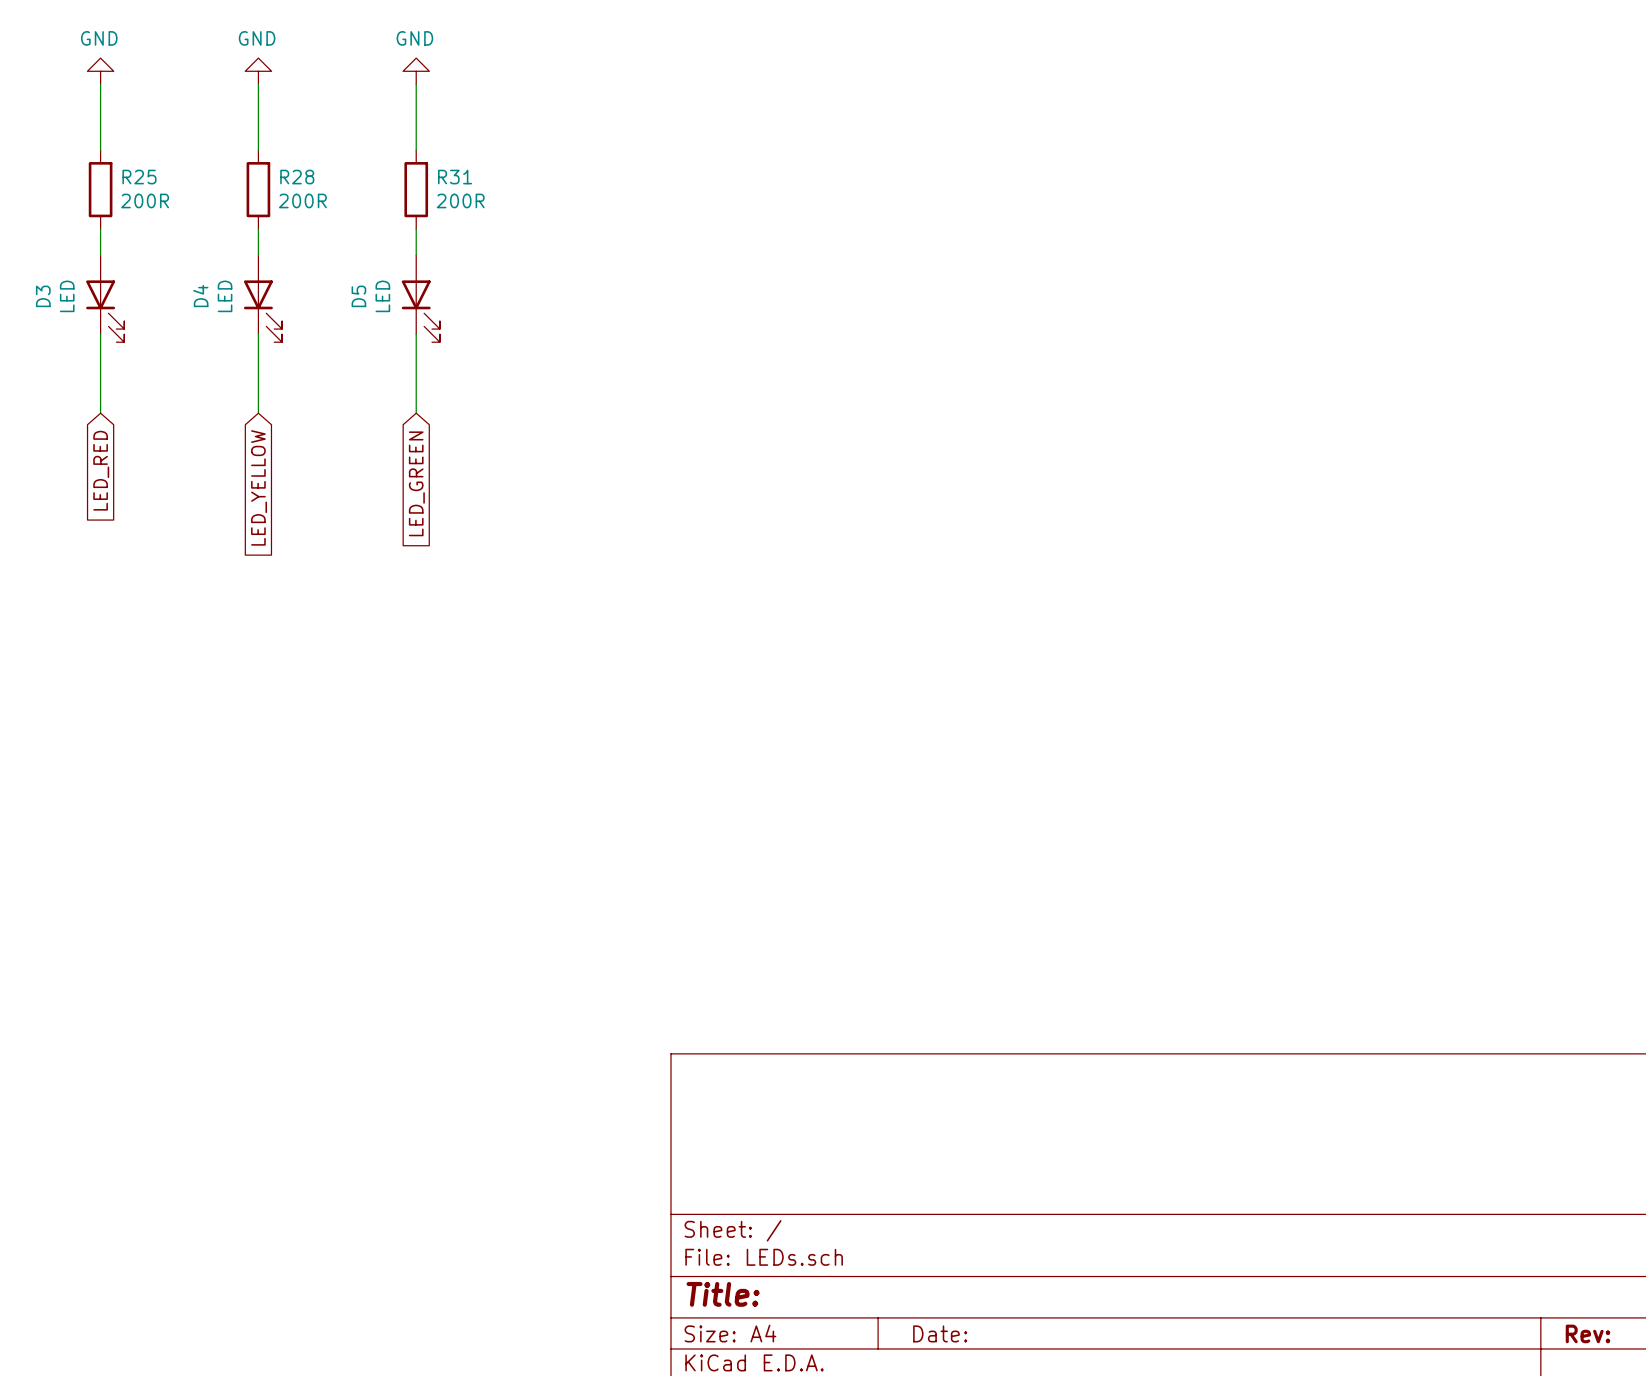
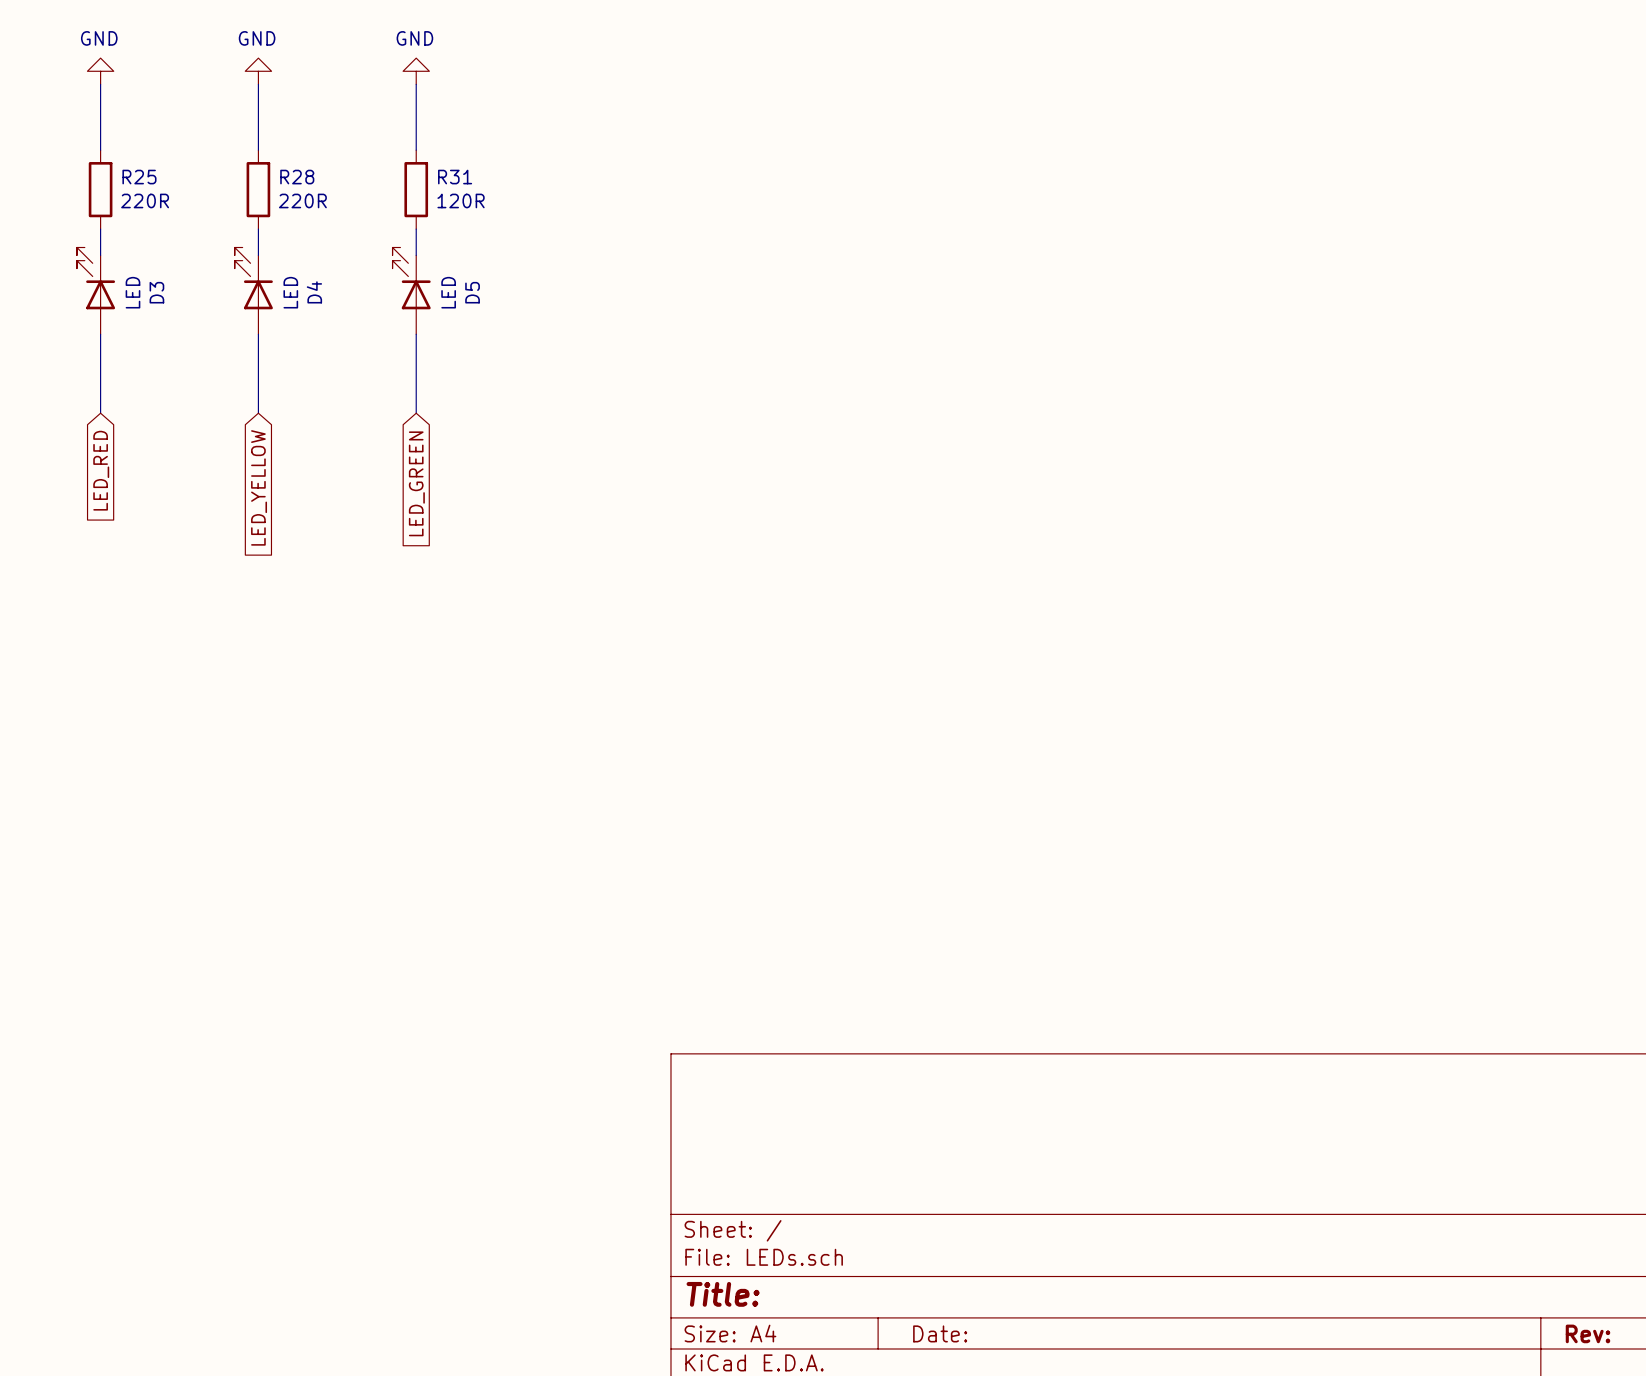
R25 value: 200R (145, 200) -> 220R (145, 200)
R28 value: 200R (302, 200) -> 220R (302, 200)
R31 value: 200R (460, 200) -> 120R (461, 200)
D3 rotation: 0° (105, 311) -> 180° (95, 278)
D4 rotation: 0° (263, 311) -> 180° (253, 278)
D5 rotation: 0° (420, 311) -> 180° (411, 278)

